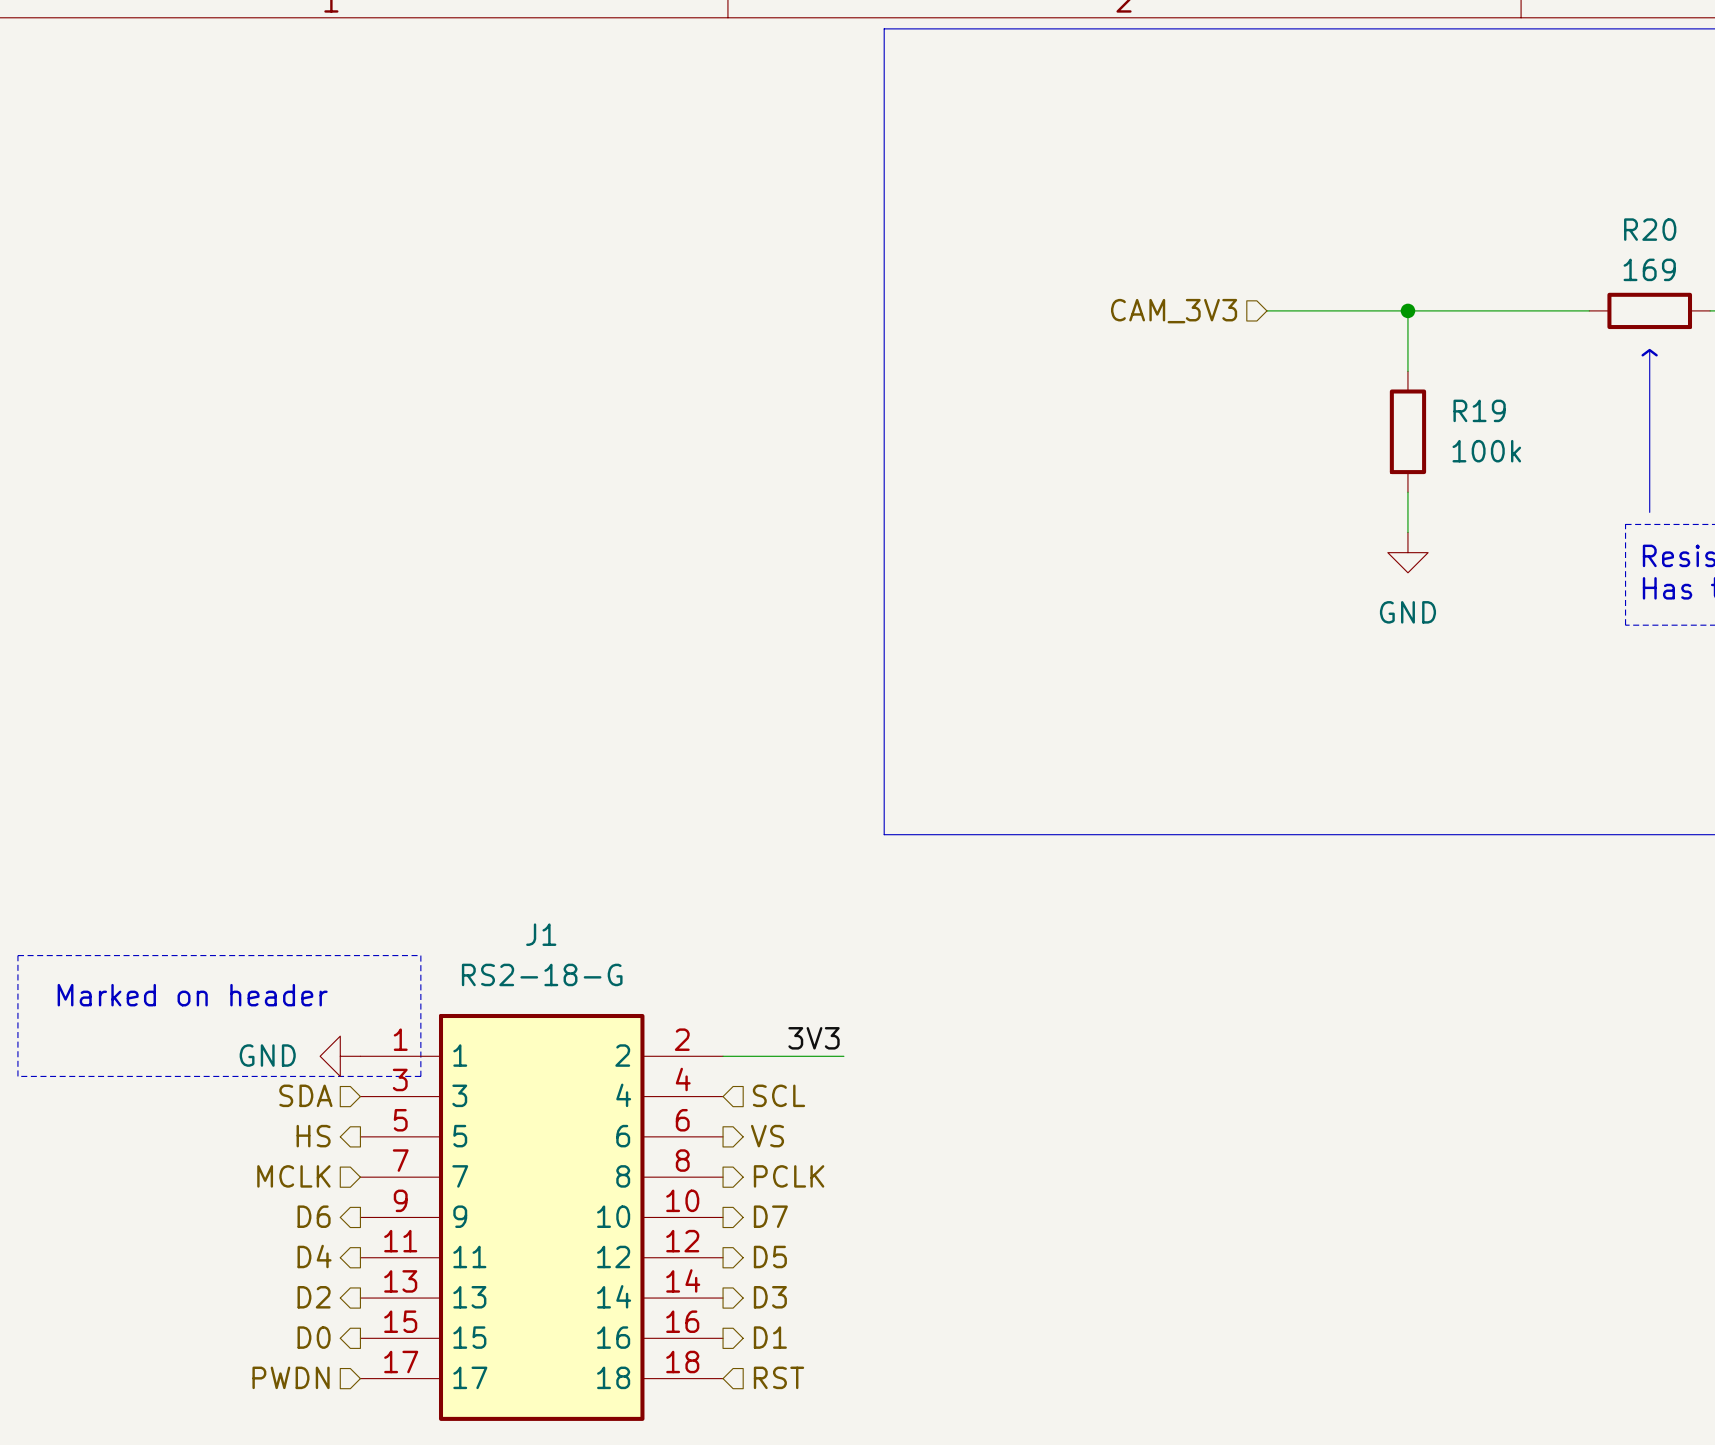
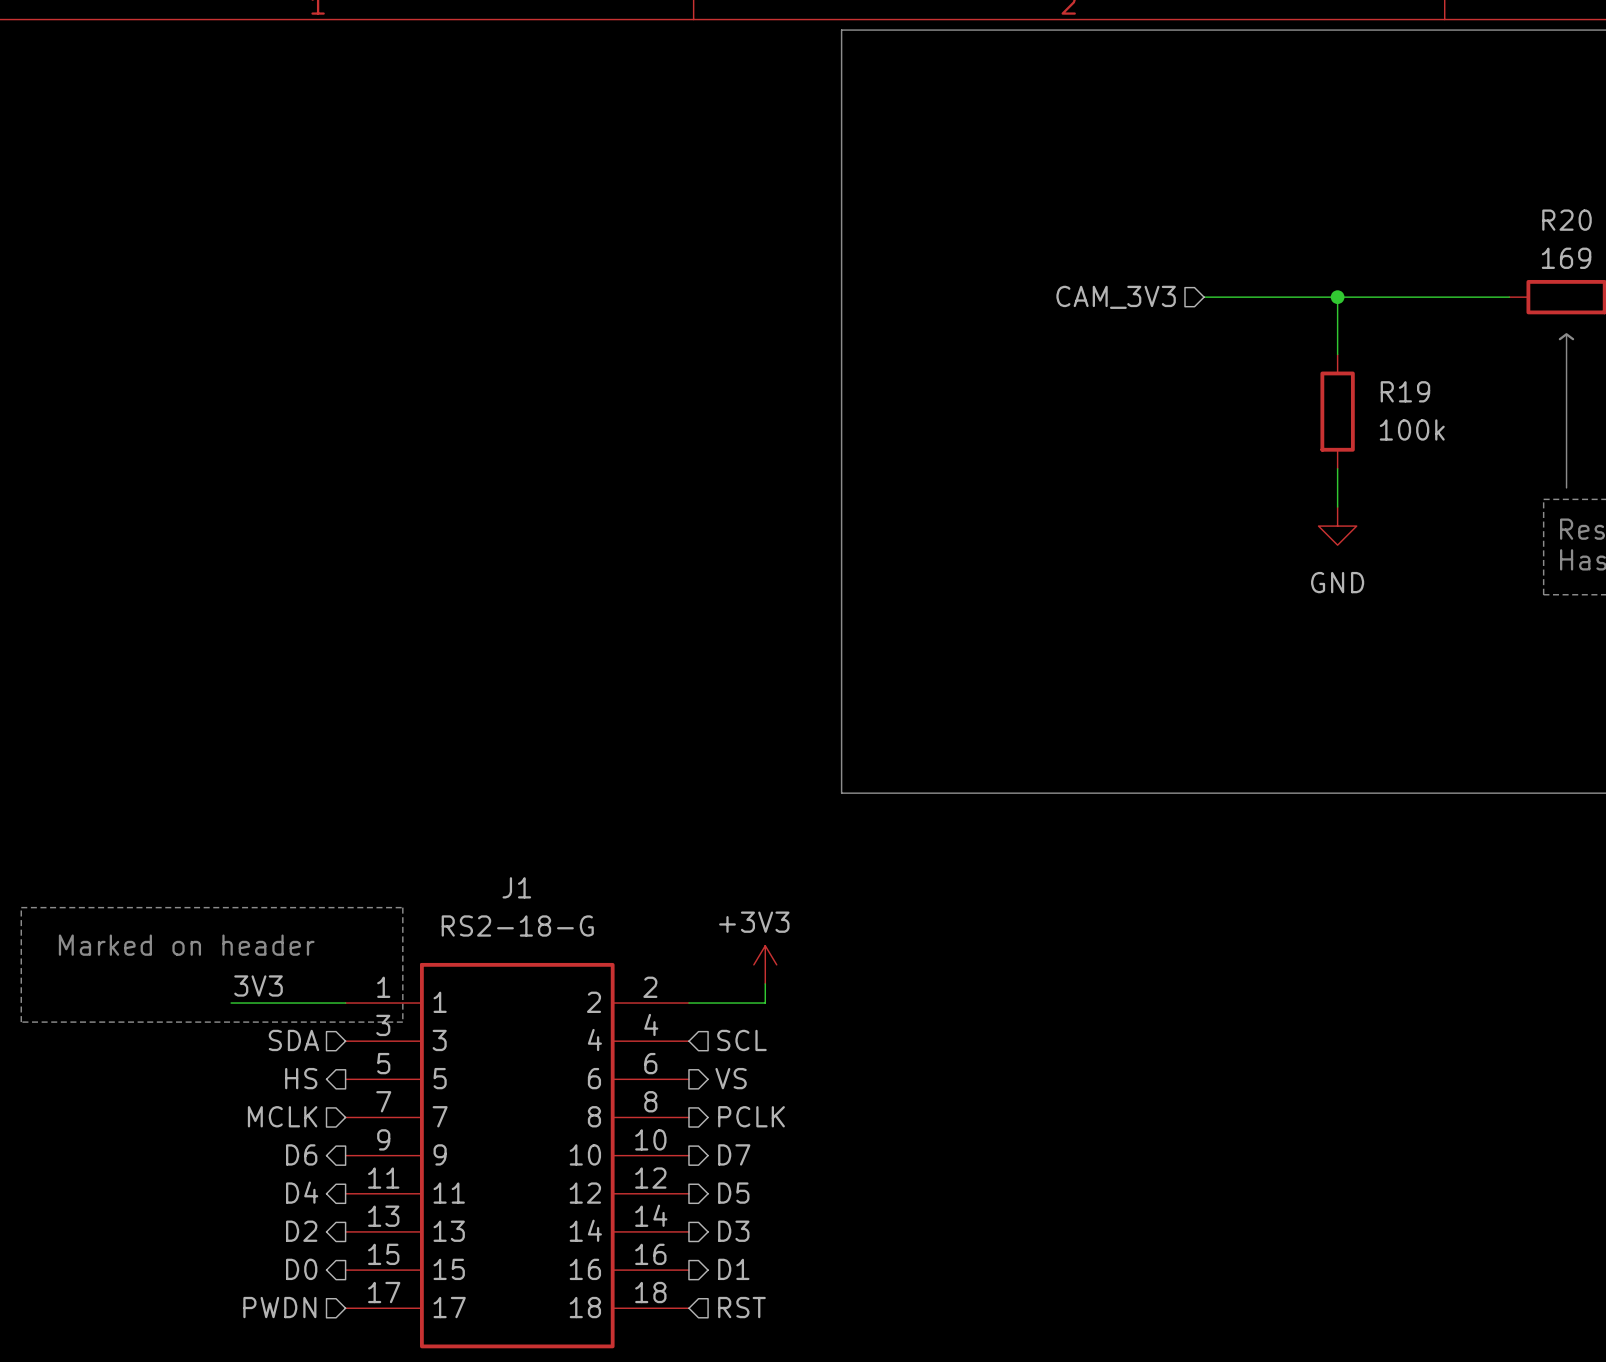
power symbol: none -> +3V3 (765, 964)
label: none -> 3V3 (258, 985)
label: 3V3 (814, 1038) -> none
wire: none -> (231, 1003) (345, 1003)
power symbol: GND (340, 1056) -> none
wire: (803, 1056) (843, 1056) -> (765, 1003) (765, 983)

